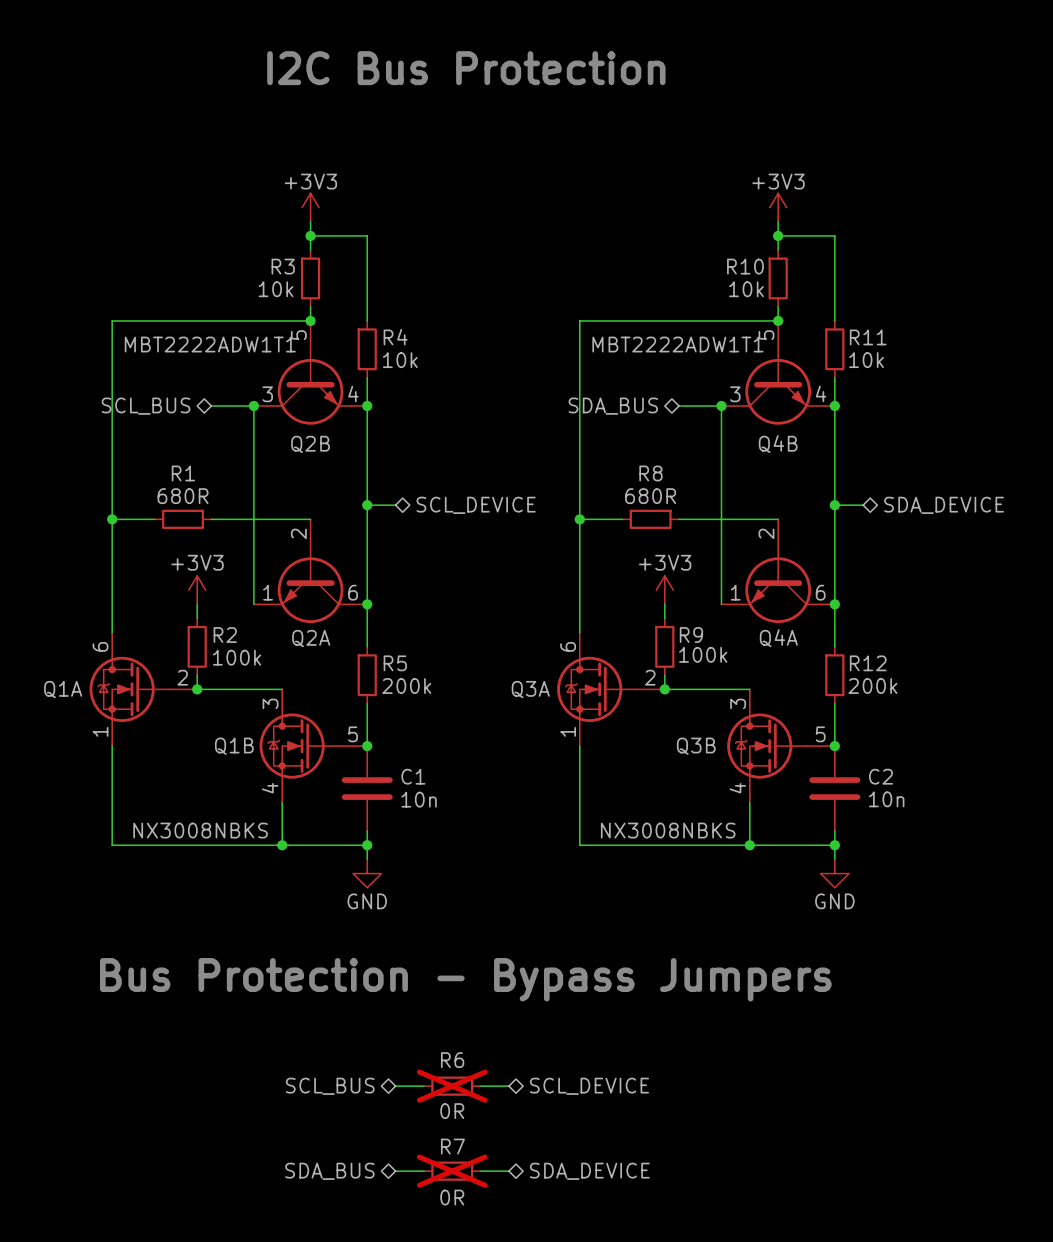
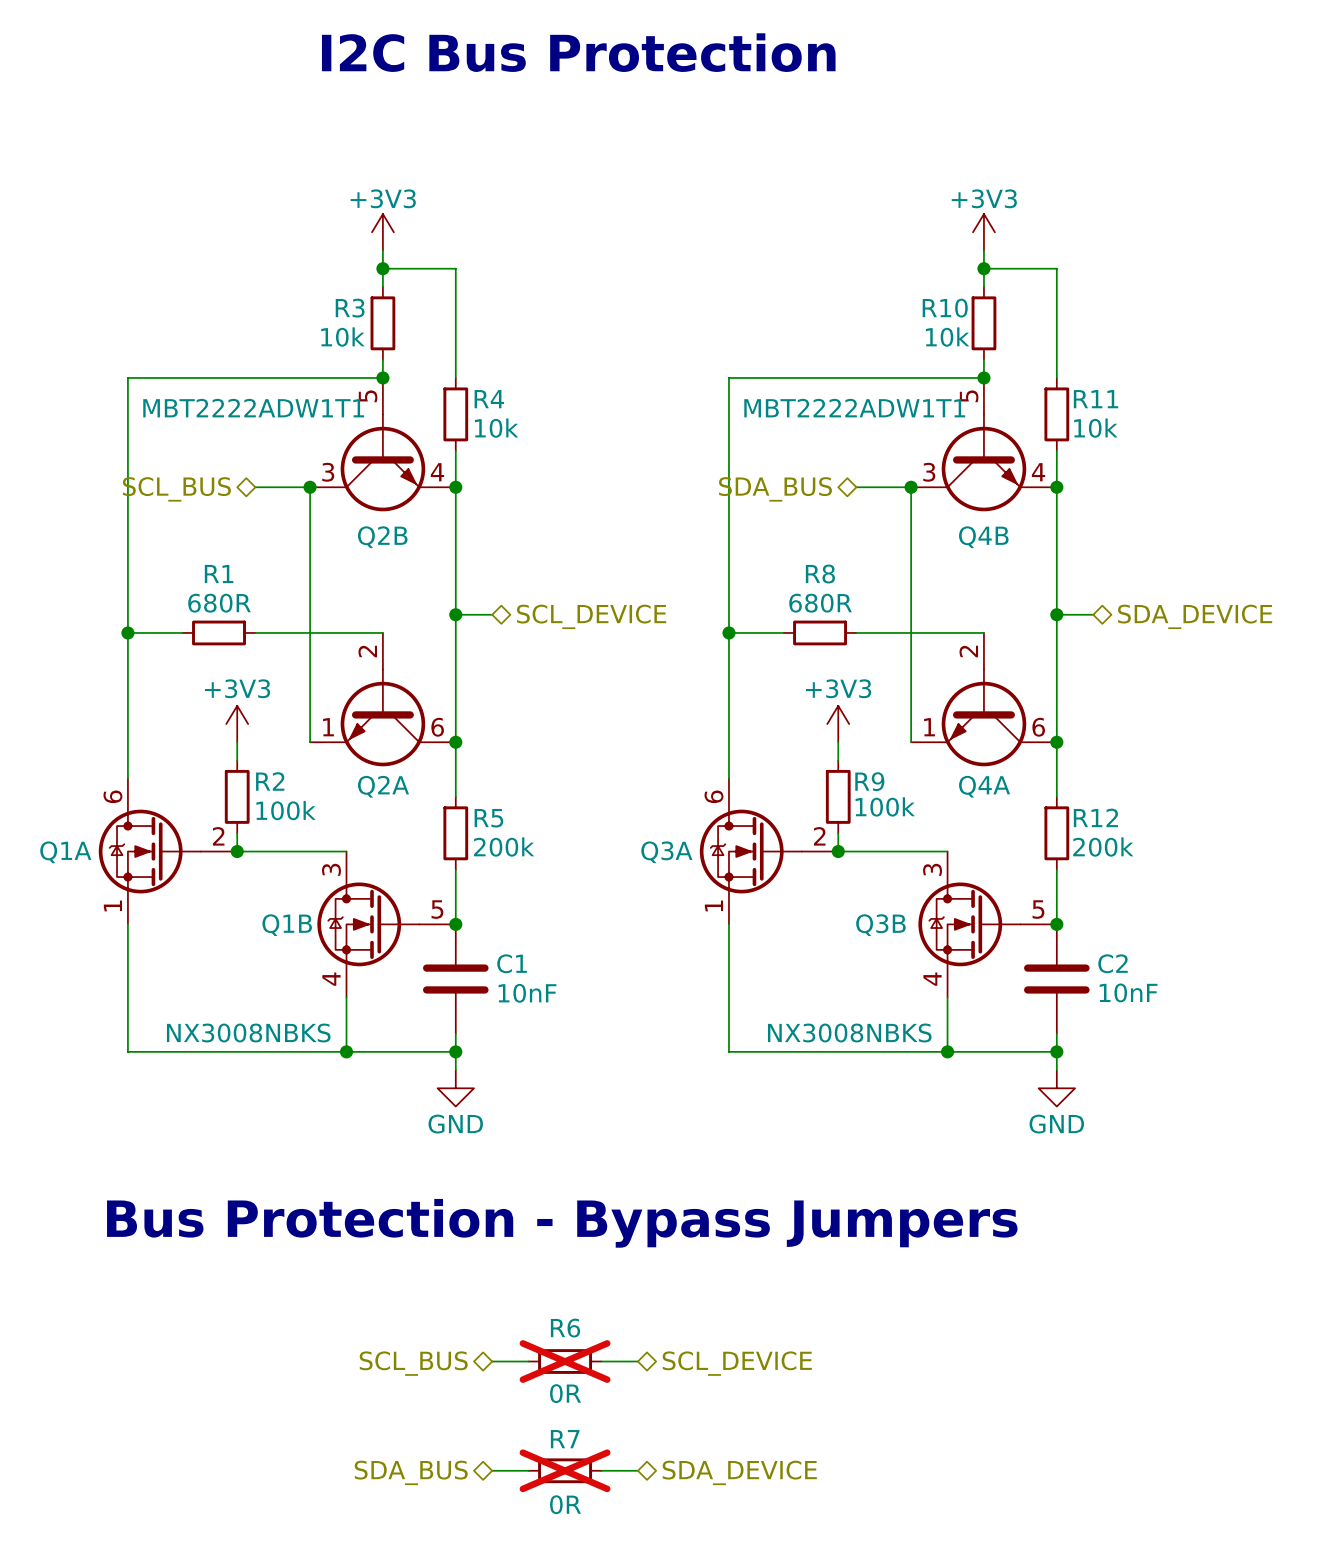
C1 value: 10n (419, 799) -> 10nF (527, 993)
C2 value: 10n (886, 799) -> 10nF (1128, 992)

